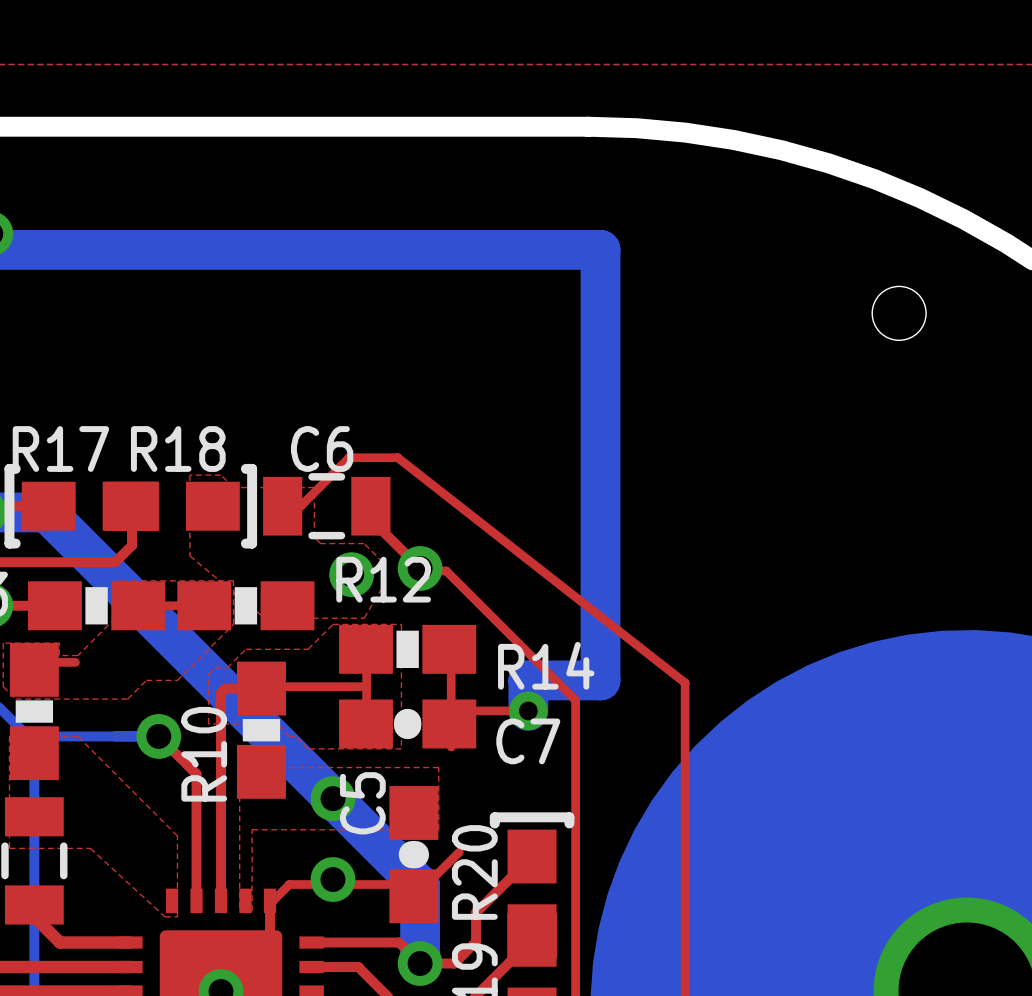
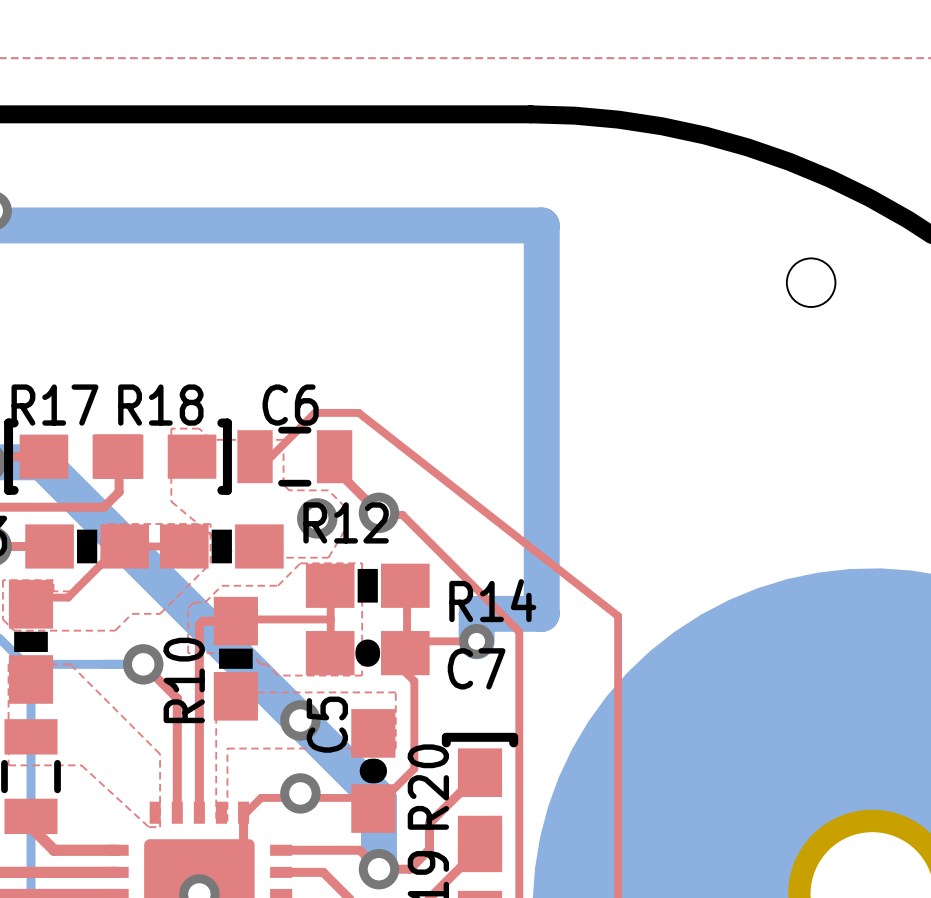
top track: none -> (119, 546) (68, 597)
top track: none -> (407, 673) (414, 681) (414, 768)

